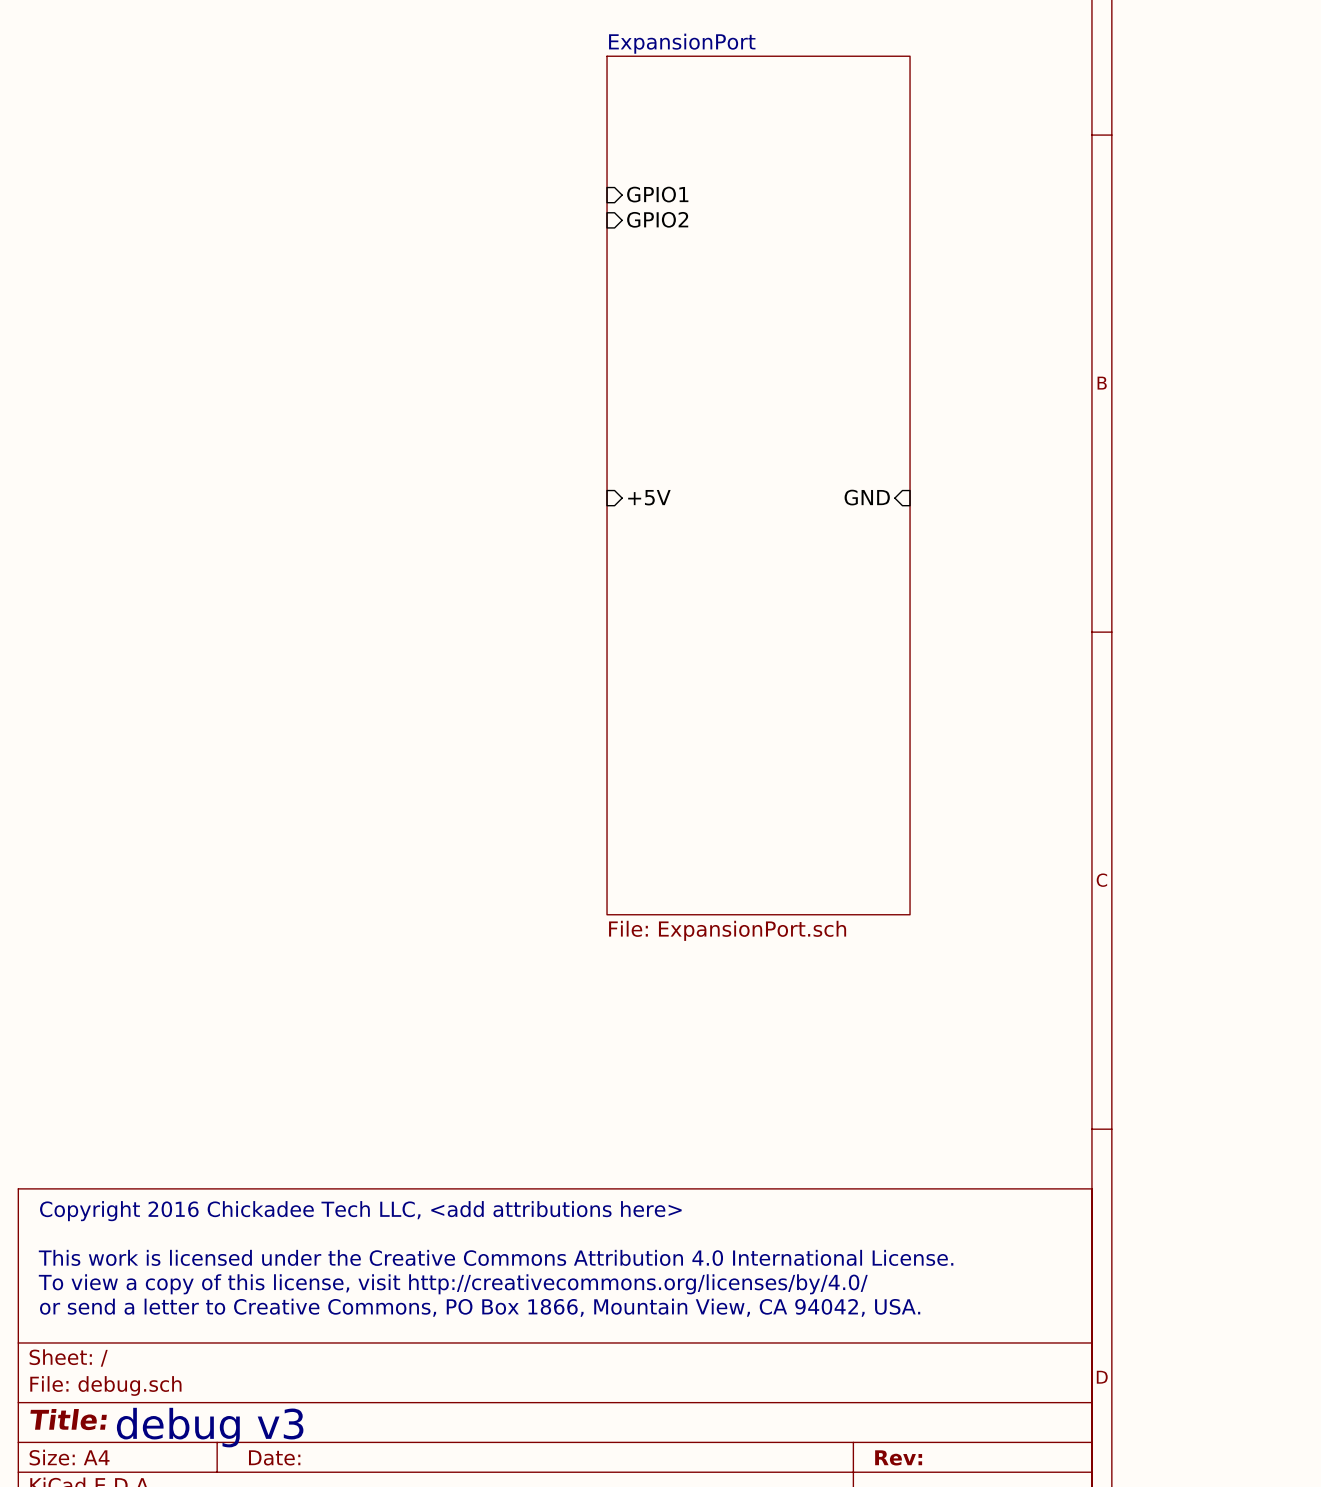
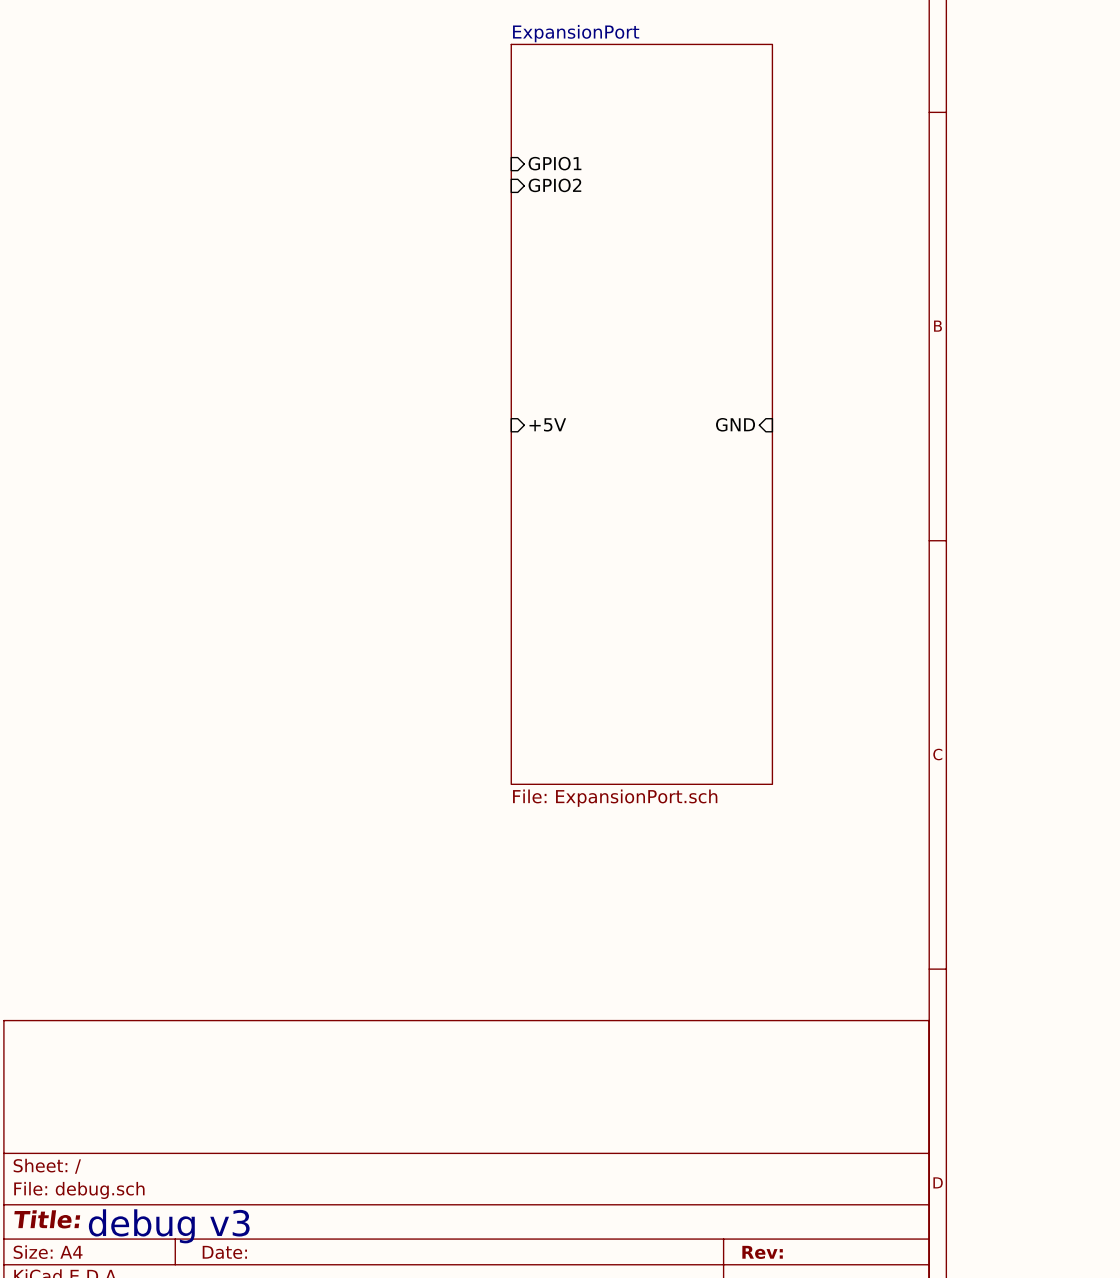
text: Copyright 2016 Chickadee Tech LLC, <add attributions here> (360, 1211) -> none
text: This work is licensed under the Creative Commons Attribution 4.0 International License. (496, 1257) -> none
text: To view a copy of this license, visit http://creativecommons.org/licenses/by/4.0/ (453, 1284) -> none
text: or send a letter to Creative Commons, PO Box 1866, Mountain View, CA 94042, USA. (480, 1307) -> none

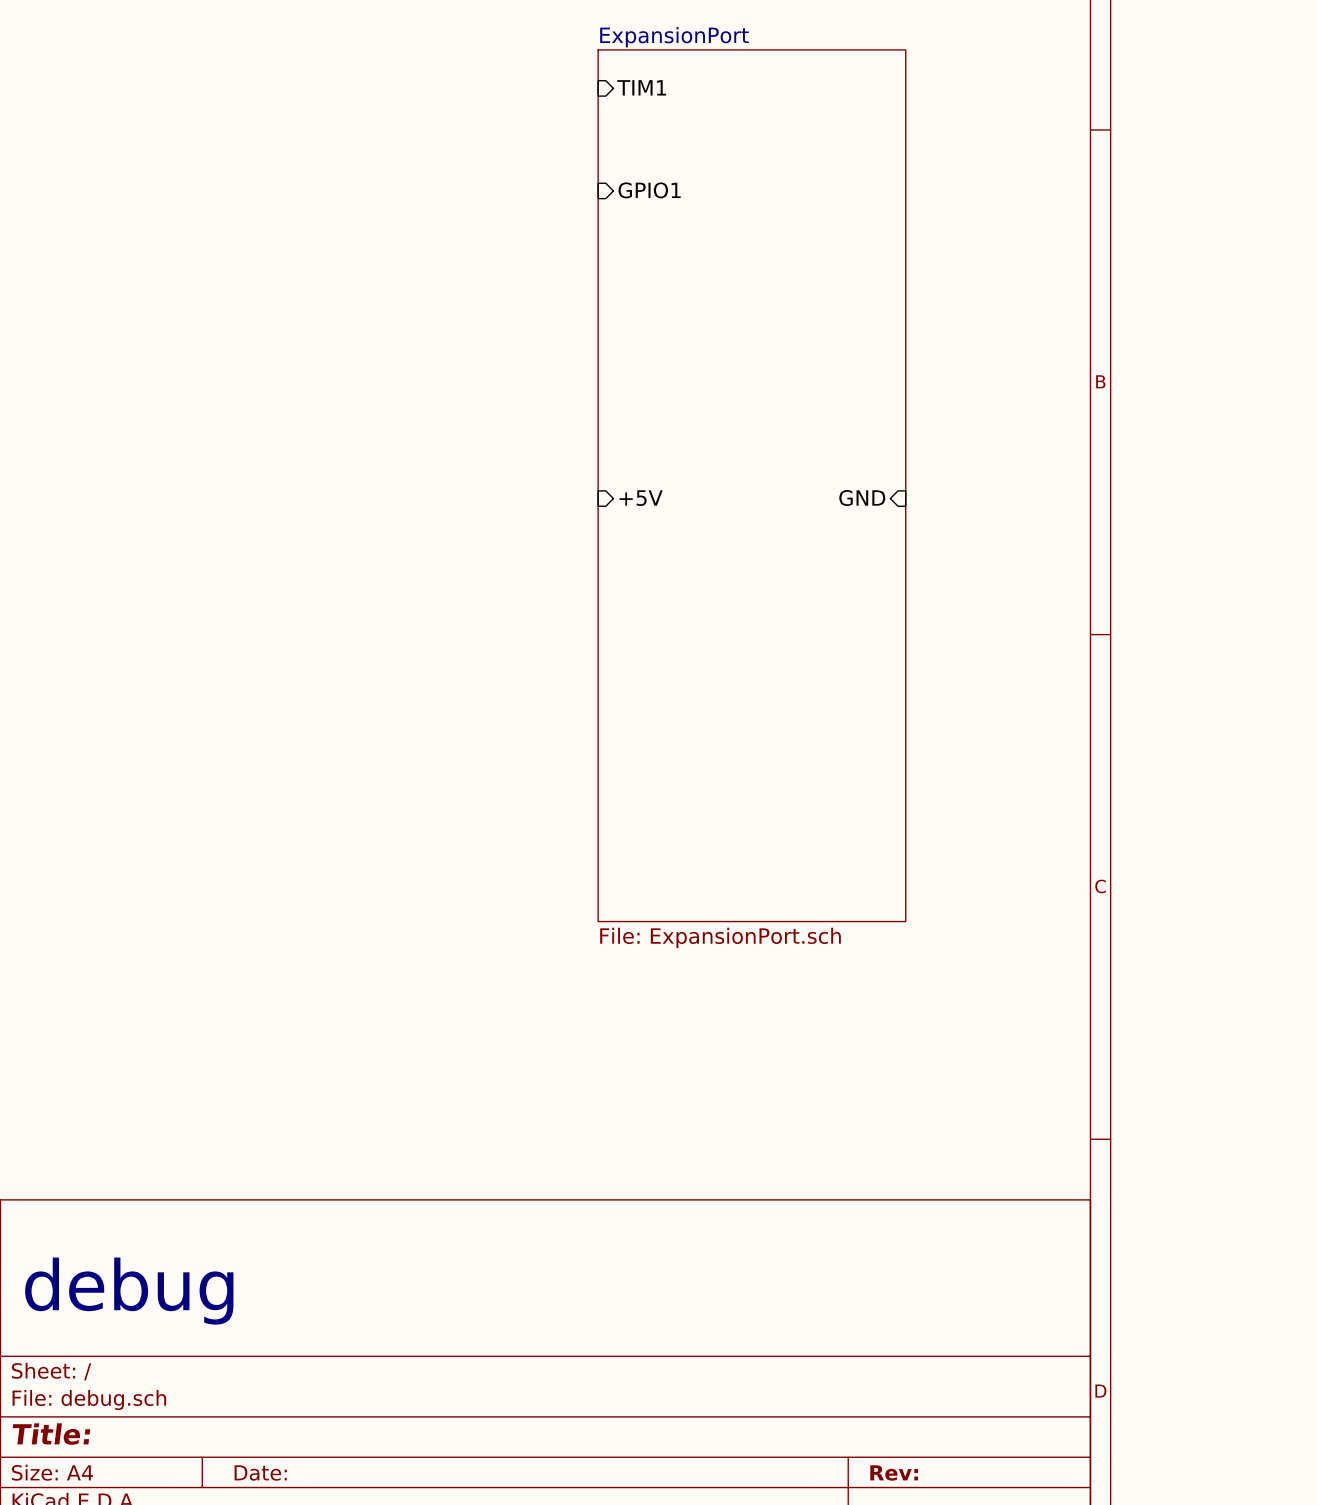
sheet pin: none -> TIM1 (641, 87)
sheet pin: GPIO2 (554, 185) -> none
text: none -> debug (129, 1291)
text: debug v3 (169, 1226) -> none

